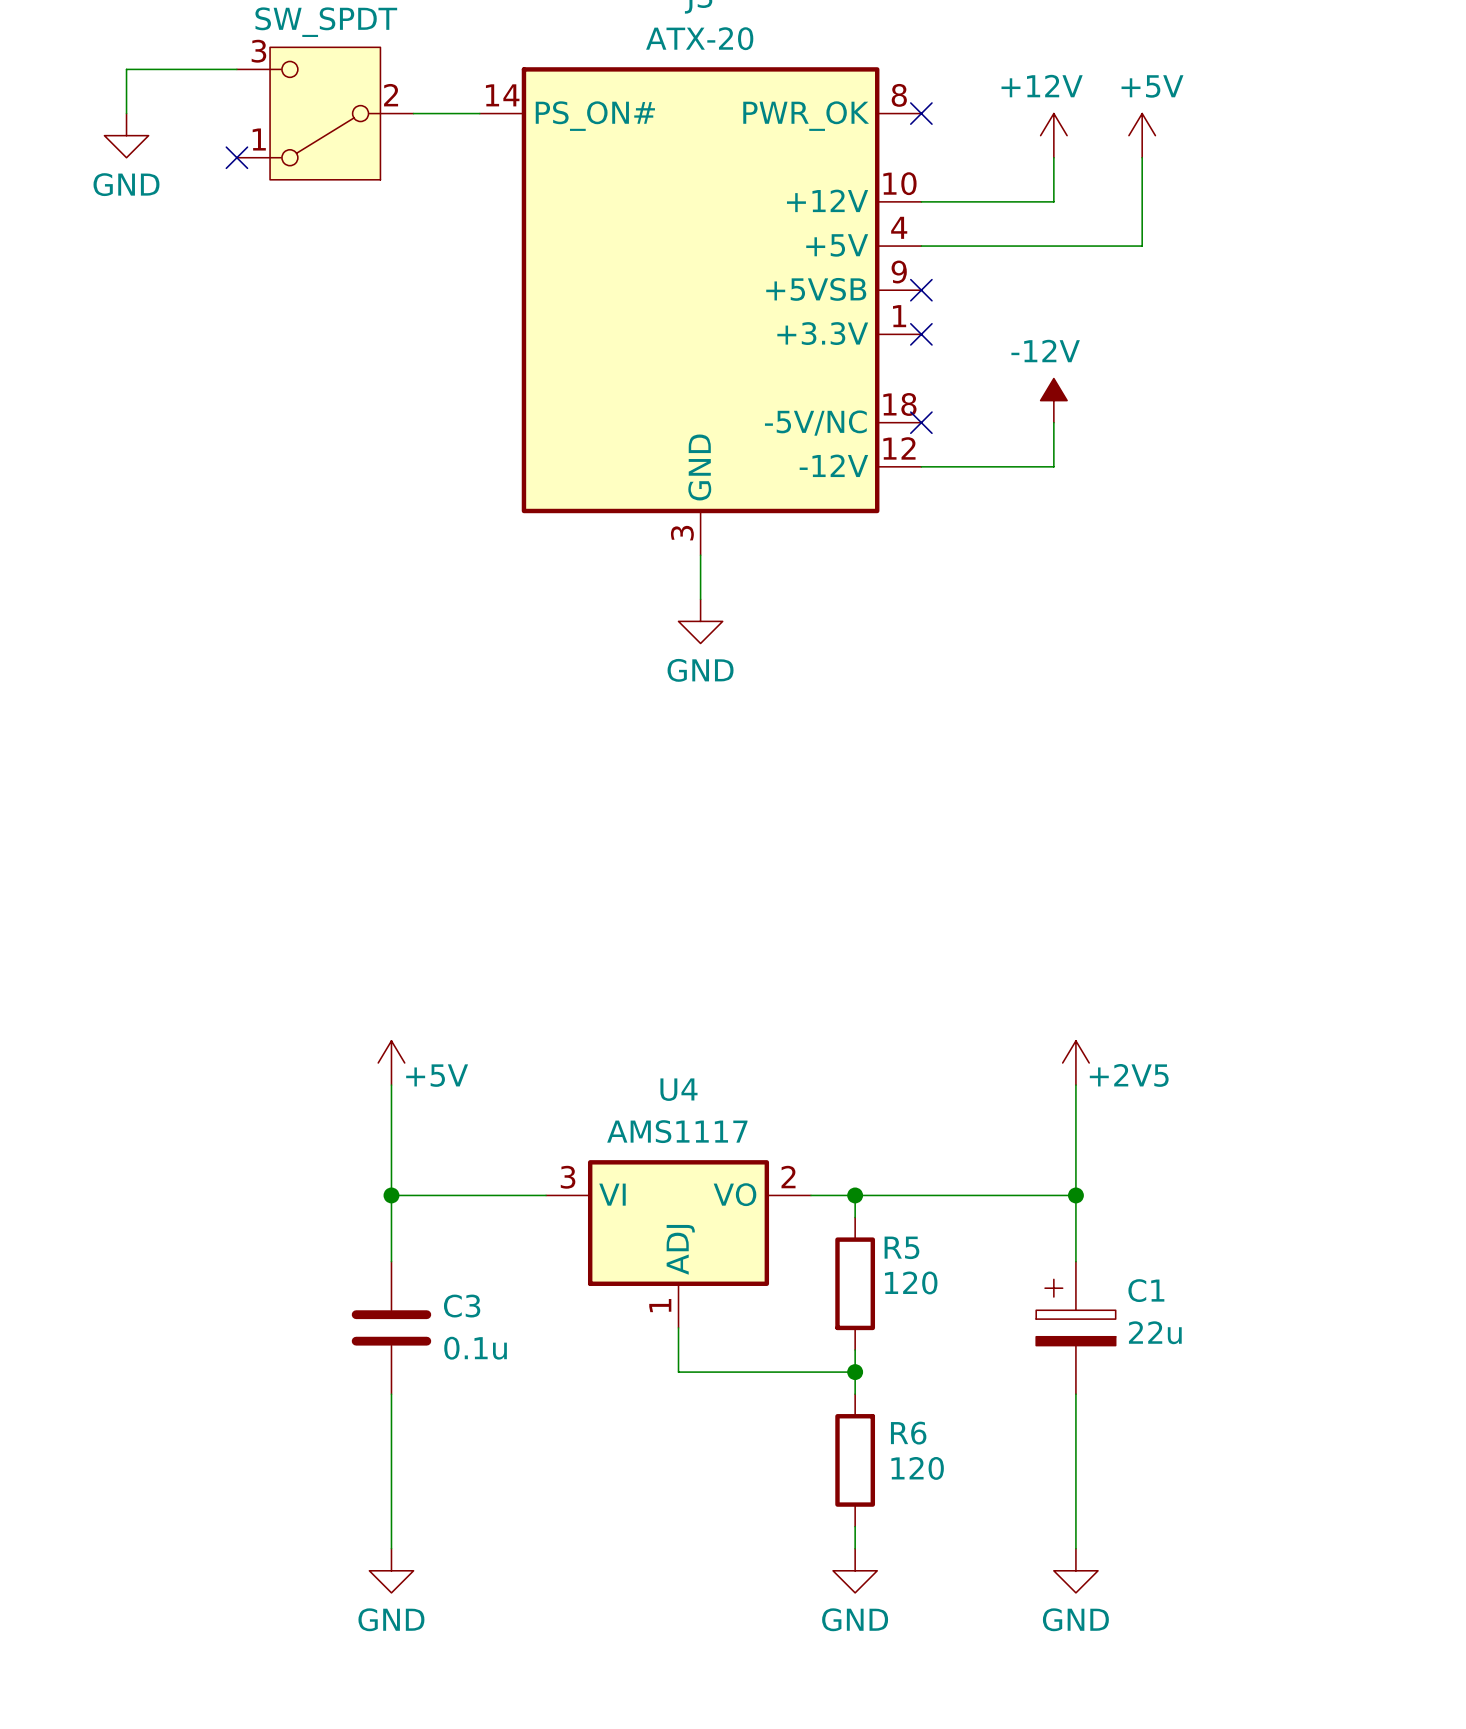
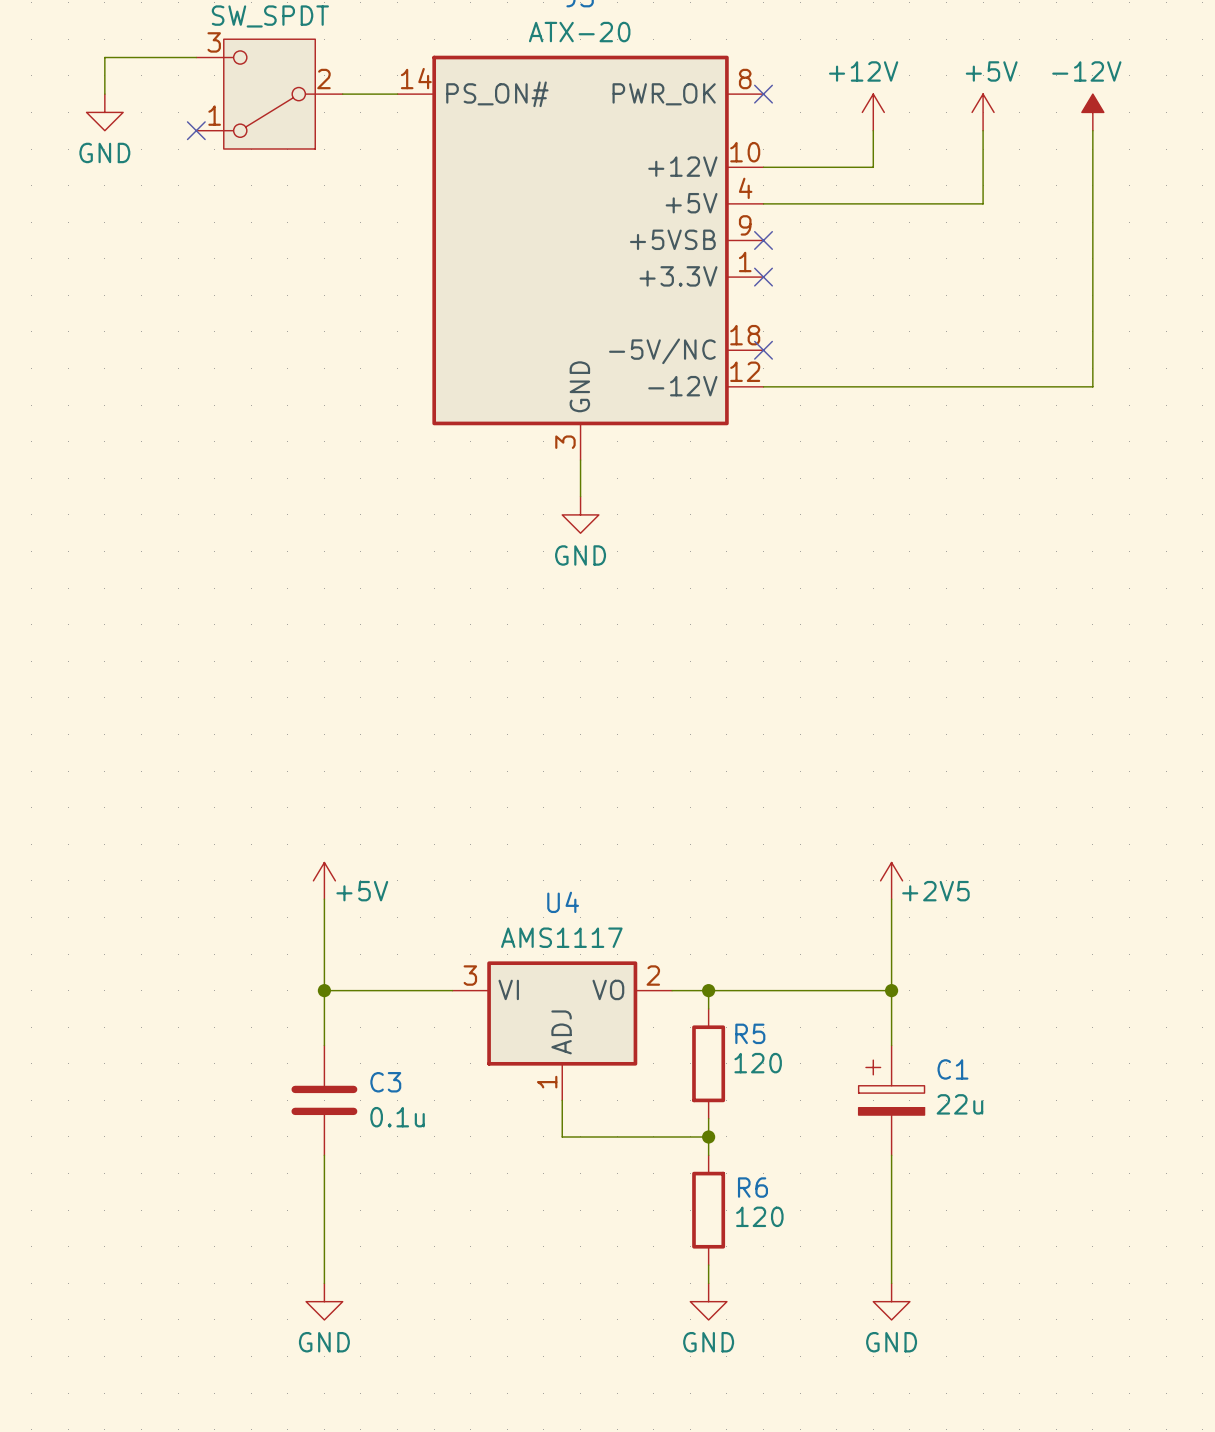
power symbol position: +5V (1142, 135) -> +5V (983, 112)
wire: (1142, 157) (1142, 246) -> (983, 130) (983, 203) (946, 203)
power symbol position: -12V (1053, 400) -> -12V (1092, 112)
wire: (1053, 422) (1053, 466) -> (1092, 130) (1092, 386) (873, 386)

